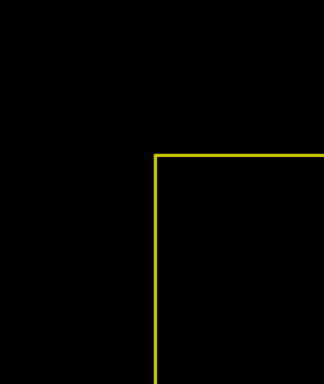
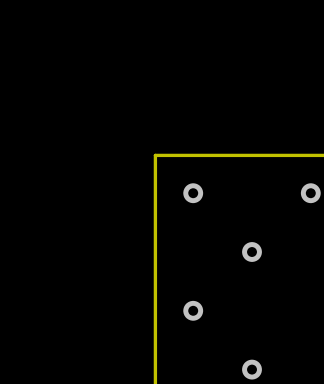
via: none -> (193, 193)
via: none -> (310, 193)
via: none -> (252, 252)
via: none -> (193, 310)
via: none -> (252, 369)

